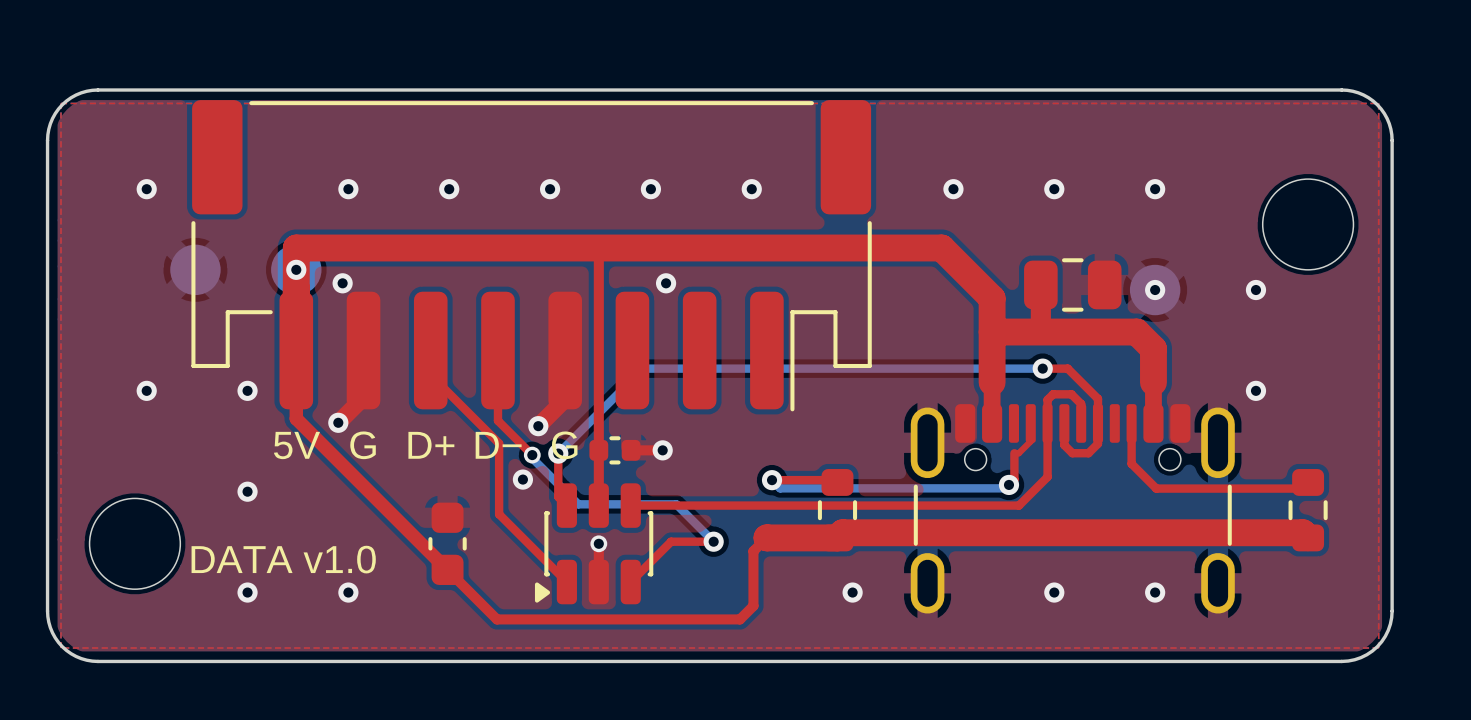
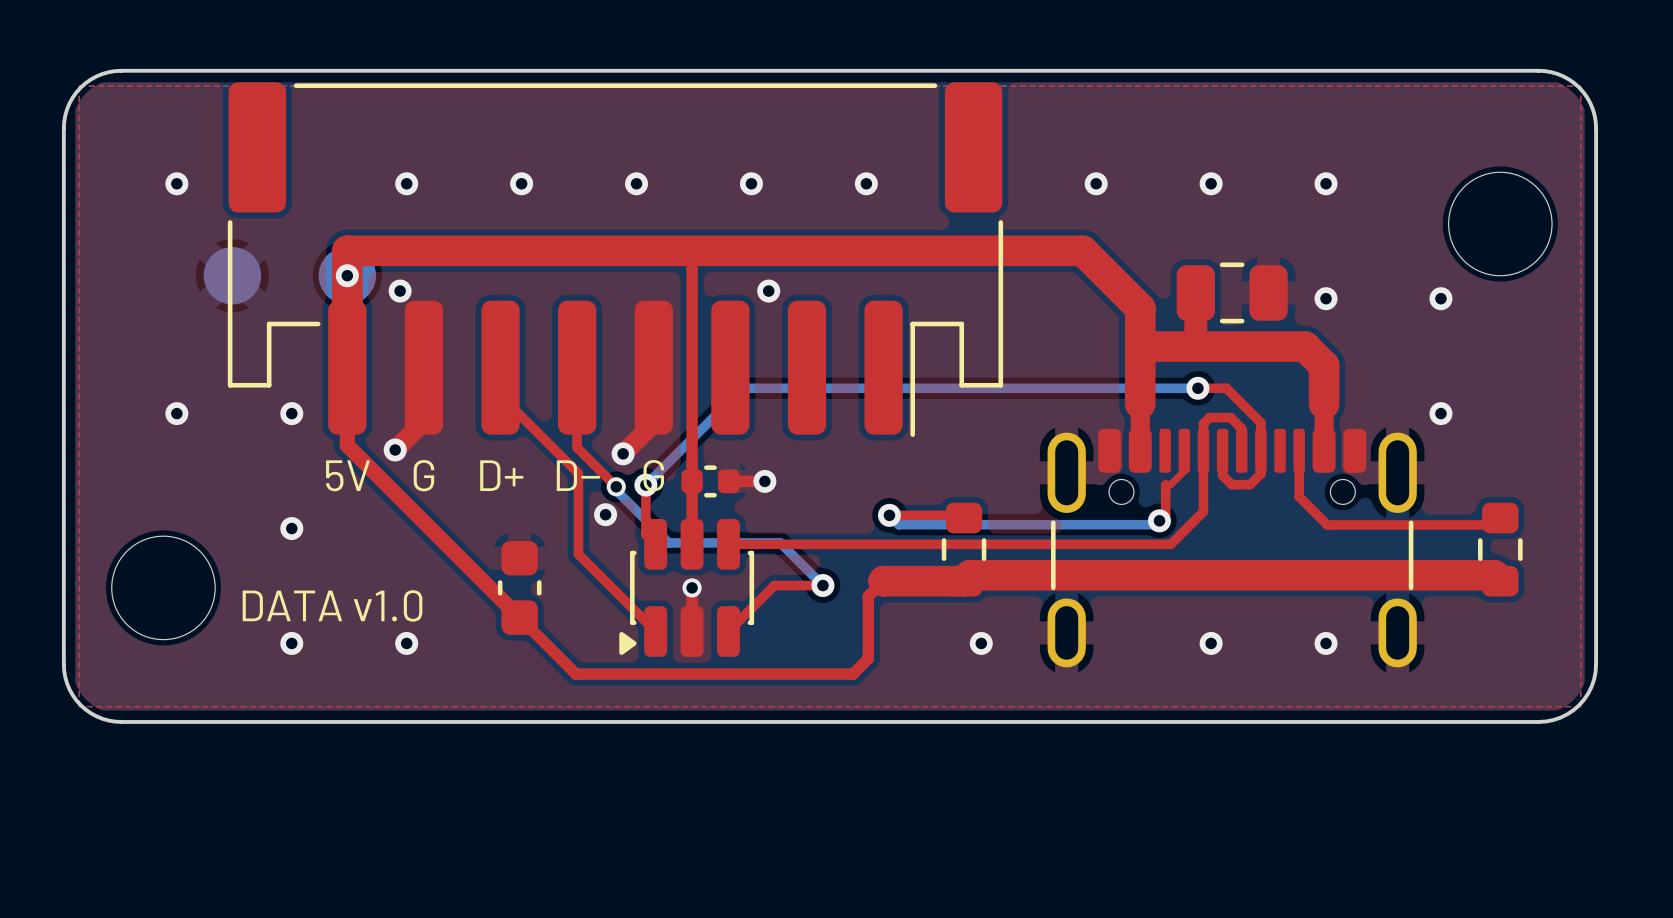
part: (1155, 290) -> none

